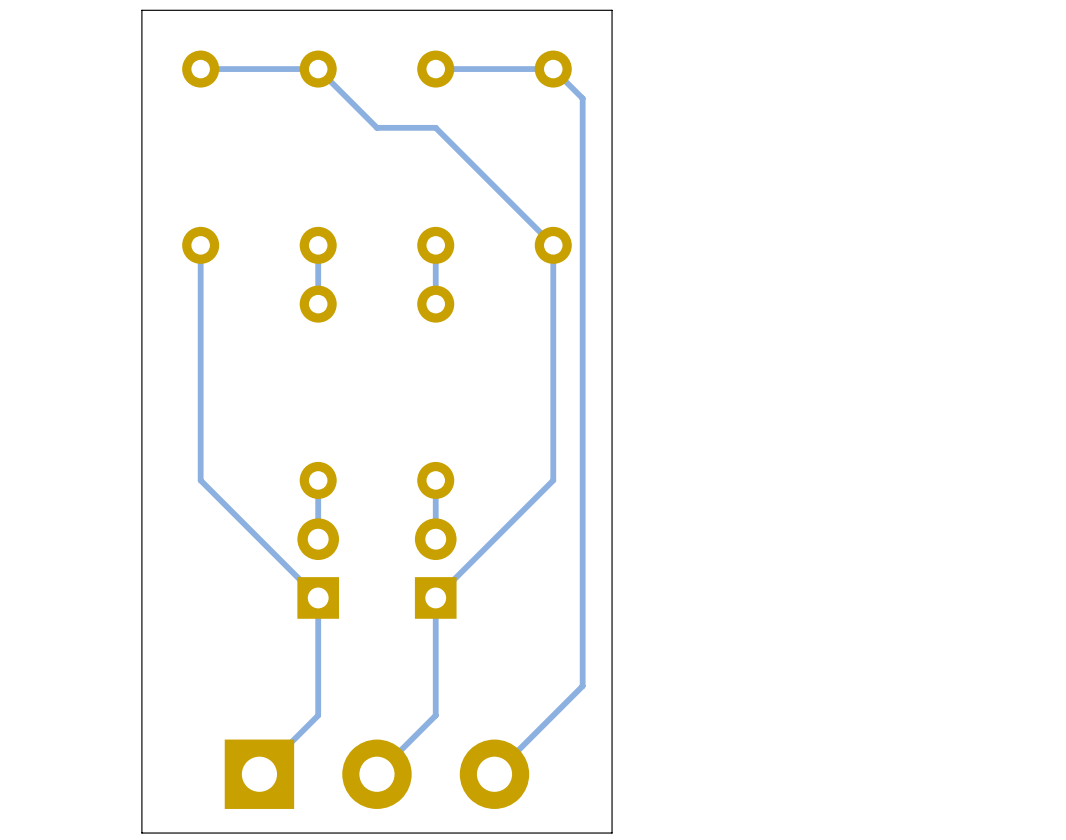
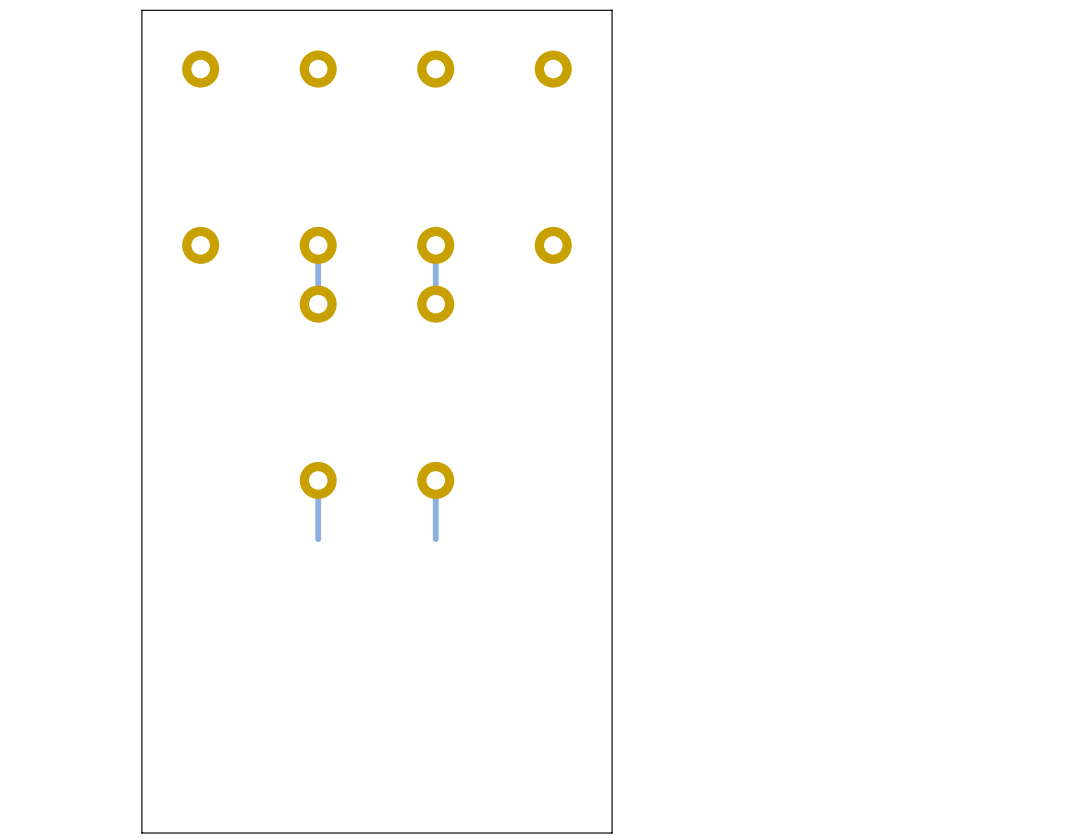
bottom track: (200, 69) (318, 69) (376, 127) (435, 127) (553, 245) (553, 480) (435, 597) (435, 715) (376, 774) -> none
bottom track: (435, 69) (553, 69) (582, 98) (582, 686) (494, 774) -> none
bottom track: (200, 245) (200, 480) (318, 597) (318, 715) (259, 774) -> none
part: (318, 568) -> none
part: (435, 568) -> none
part: (376, 774) -> none

